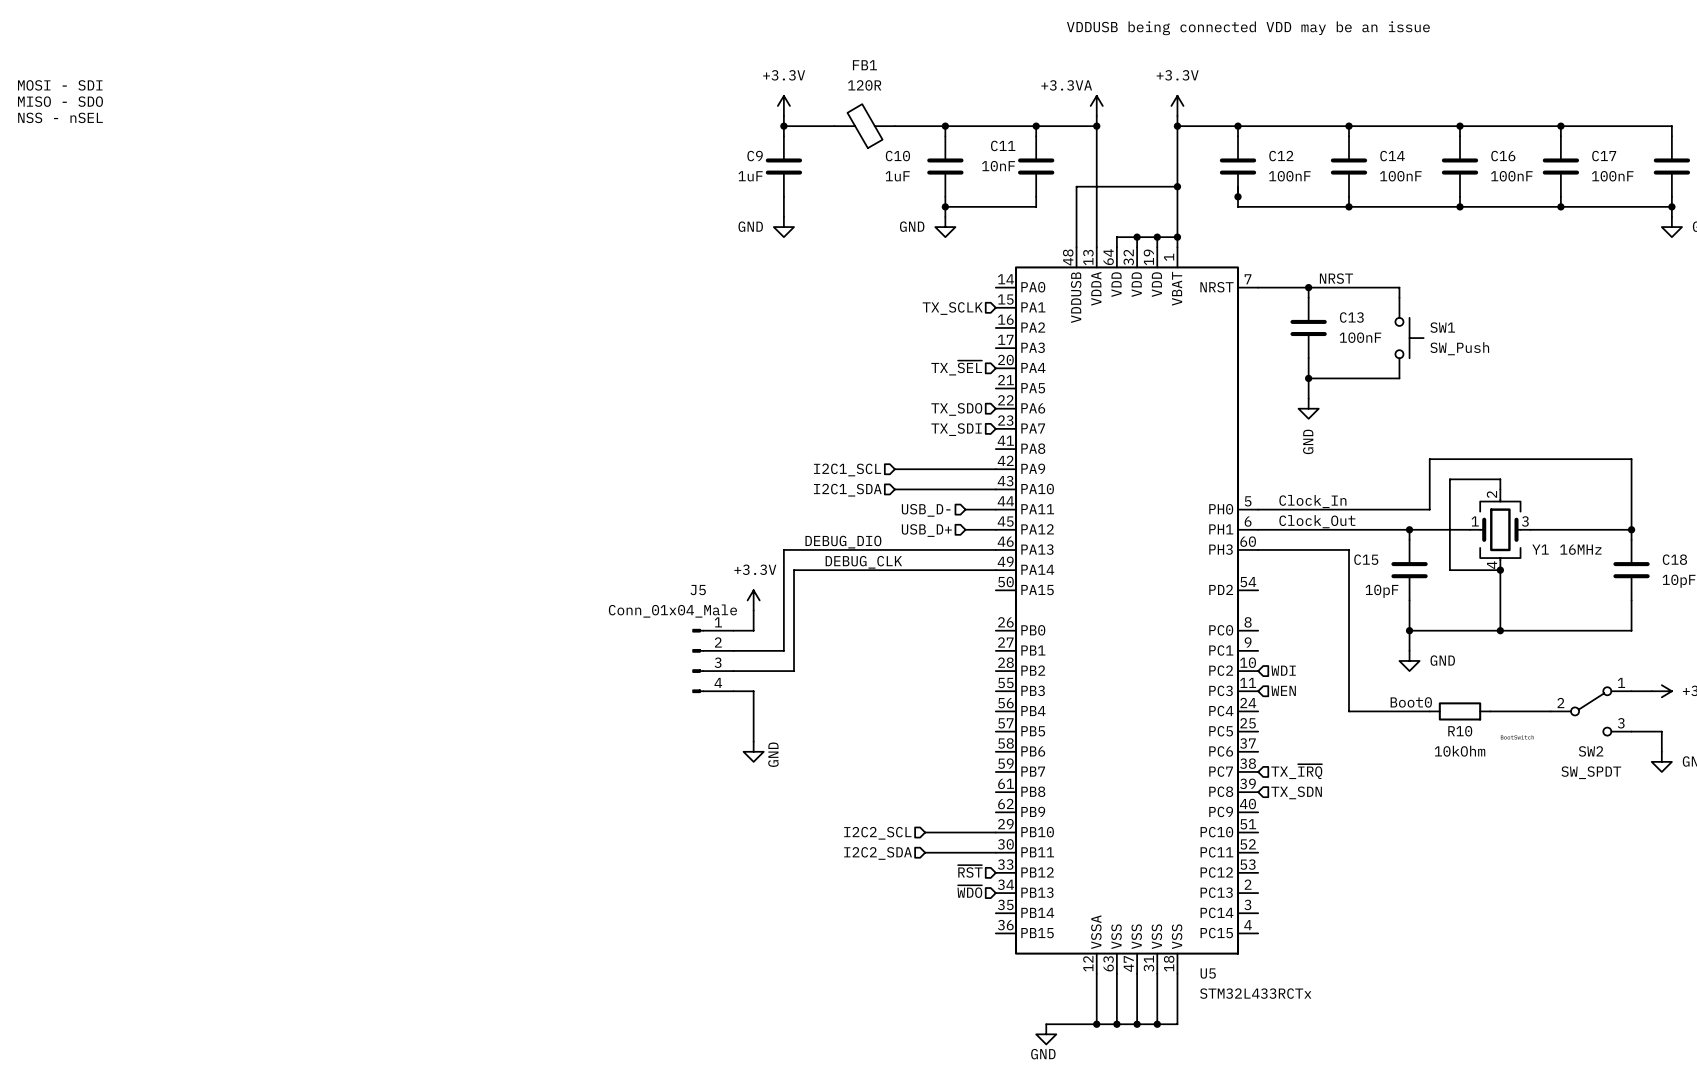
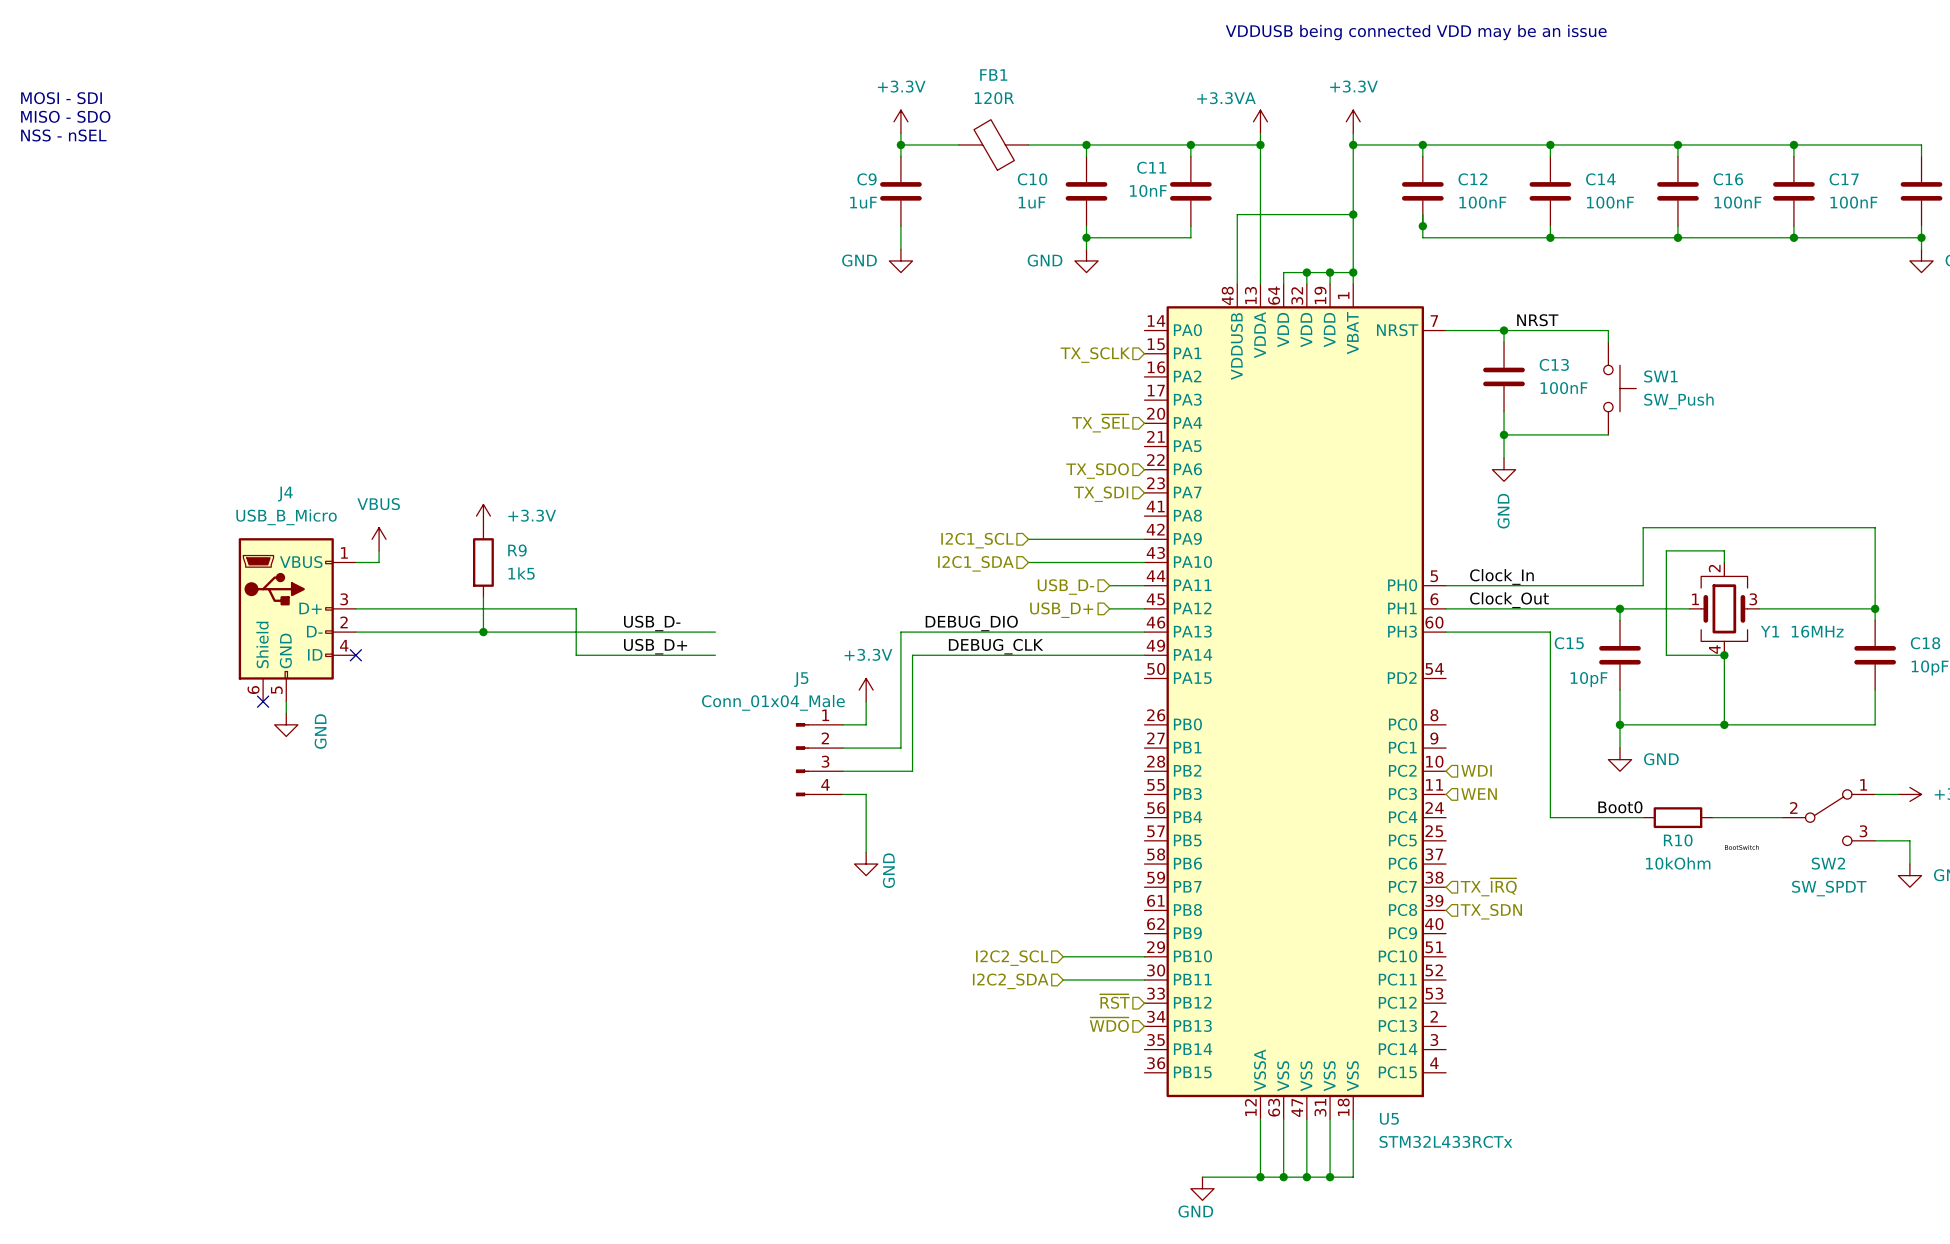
power symbol: none -> +3.3V (483, 516)
power symbol: none -> VBUS (379, 539)
wire: none -> (379, 550) (379, 562) (355, 562)
R9: none -> 1k5 (483, 562)
wire: none -> (483, 597) (483, 632)
wire: none -> (355, 608) (576, 608) (576, 655) (715, 655)
J4: none -> USB_B_Micro (297, 619)
label: none -> USB_D- (652, 623)
wire: none -> (355, 632) (715, 632)
junction: none -> (483, 632)
label: none -> USB_D+ (655, 646)
no-connect mark: none -> (355, 655)
no-connect mark: none -> (263, 701)
wire: none -> (286, 701) (286, 713)
power symbol: none -> GND (286, 724)

